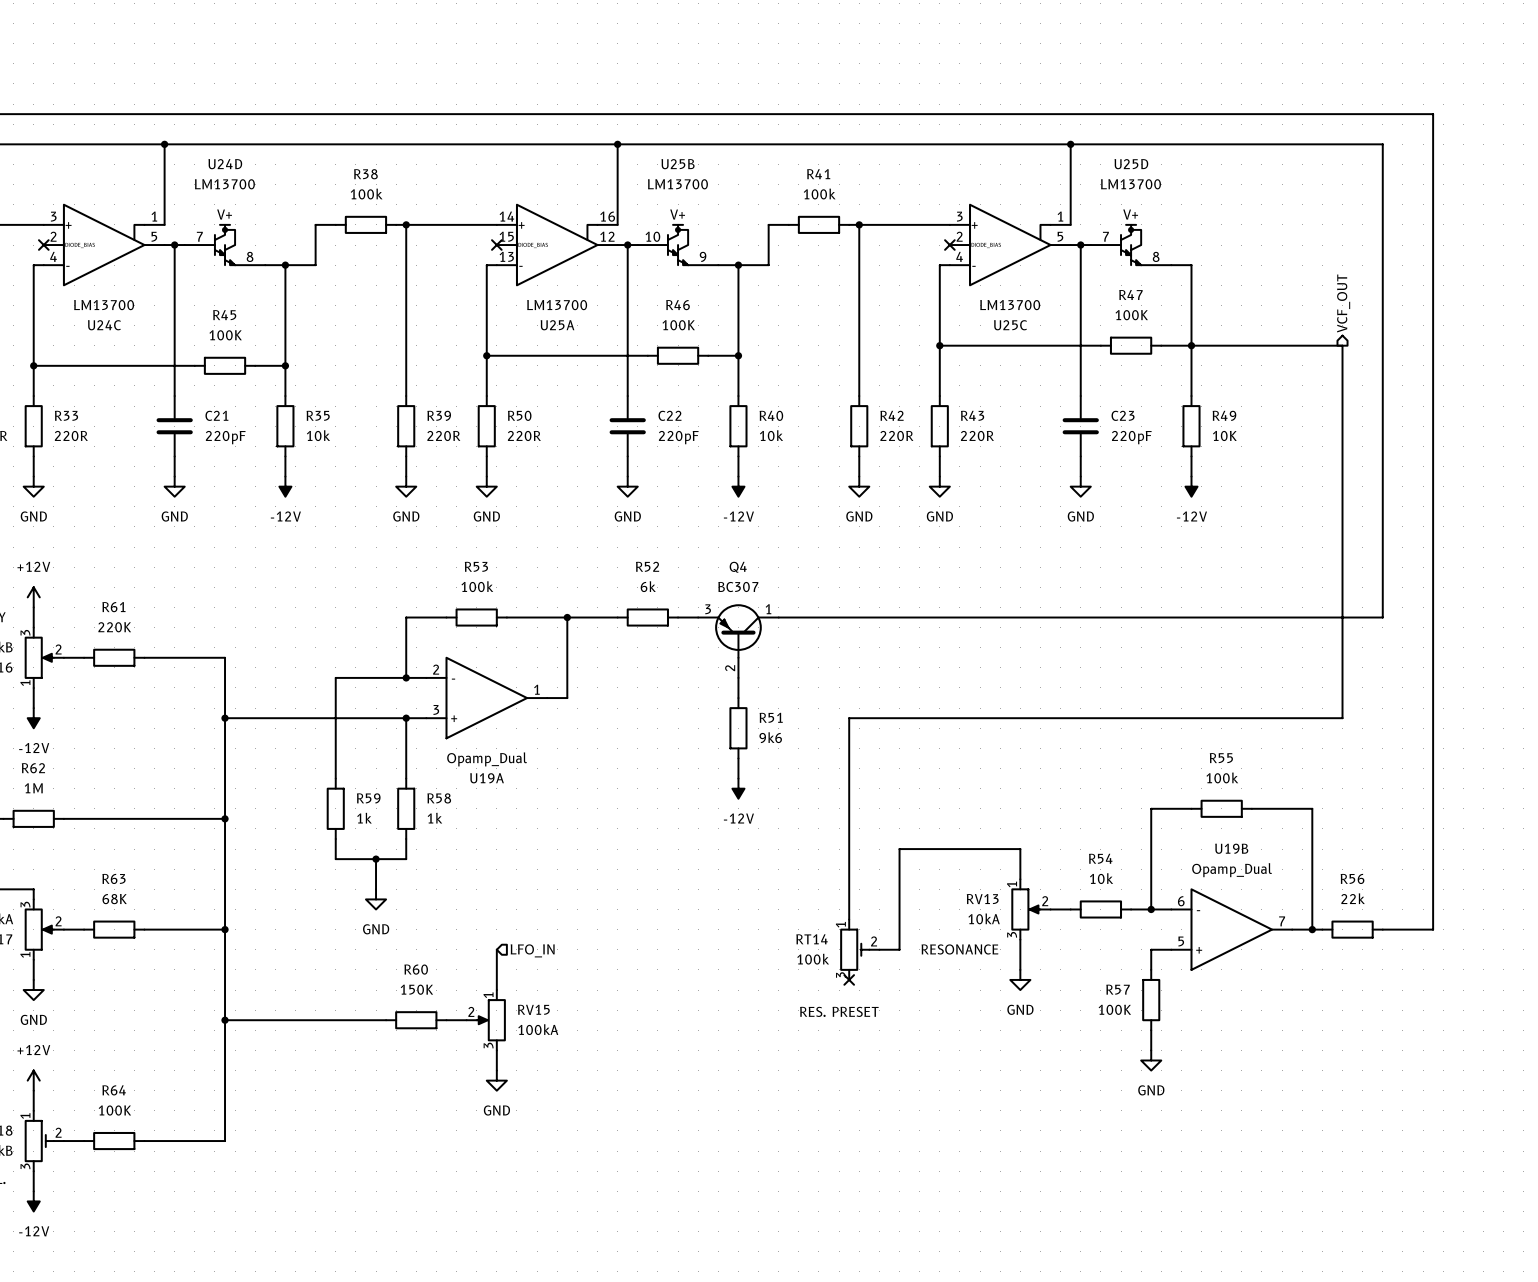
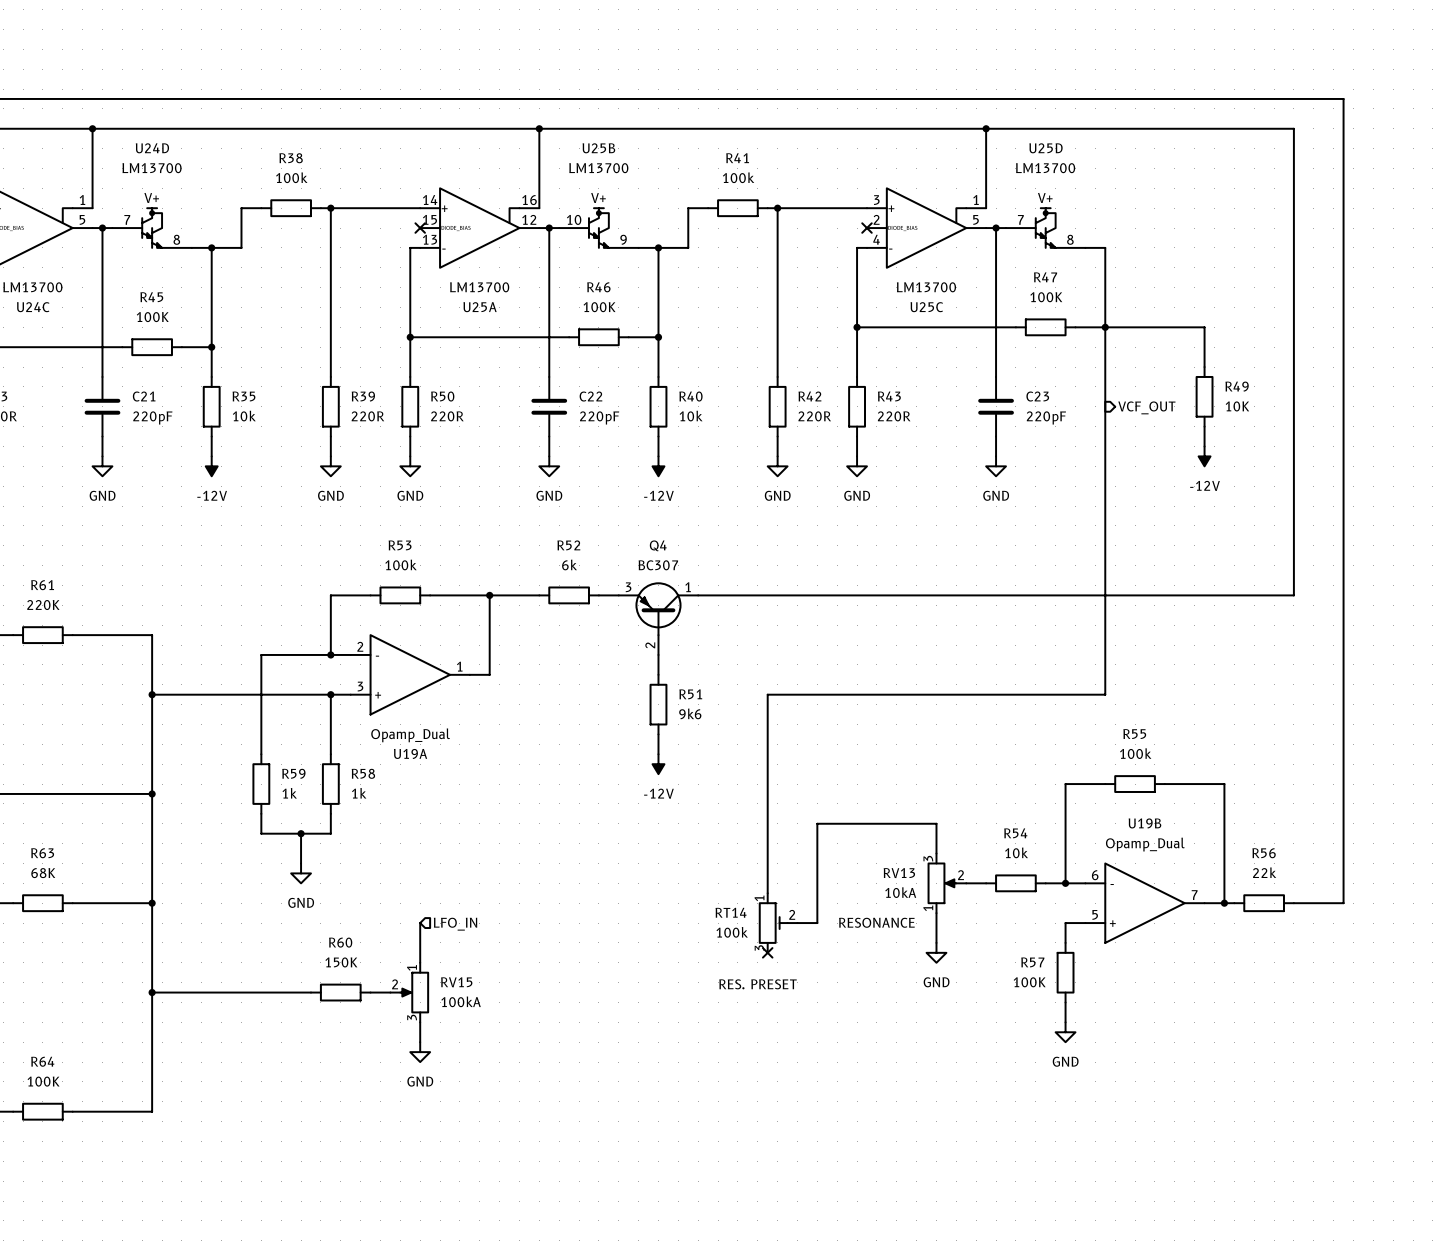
hierarchical label rotation: 0° (1343, 303) -> 90° clockwise (1146, 407)
hierarchical label position: VCF_OUT (1343, 303) -> VCF_OUT (1146, 407)
wire: (1292, 345) (1342, 345) (1342, 718) (1191, 718) -> (1105, 456) (1105, 694)
wire: none -> (1204, 327) (1204, 367)
wire: none -> (1105, 376) (1105, 436)
R49 position: (1191, 426) -> (1204, 396)
wire: none -> (1204, 426) (1204, 446)
power symbol position: -12V (1191, 486) -> -12V (1204, 456)
RV13 flip: as is (1025, 909) -> up-down (941, 883)

